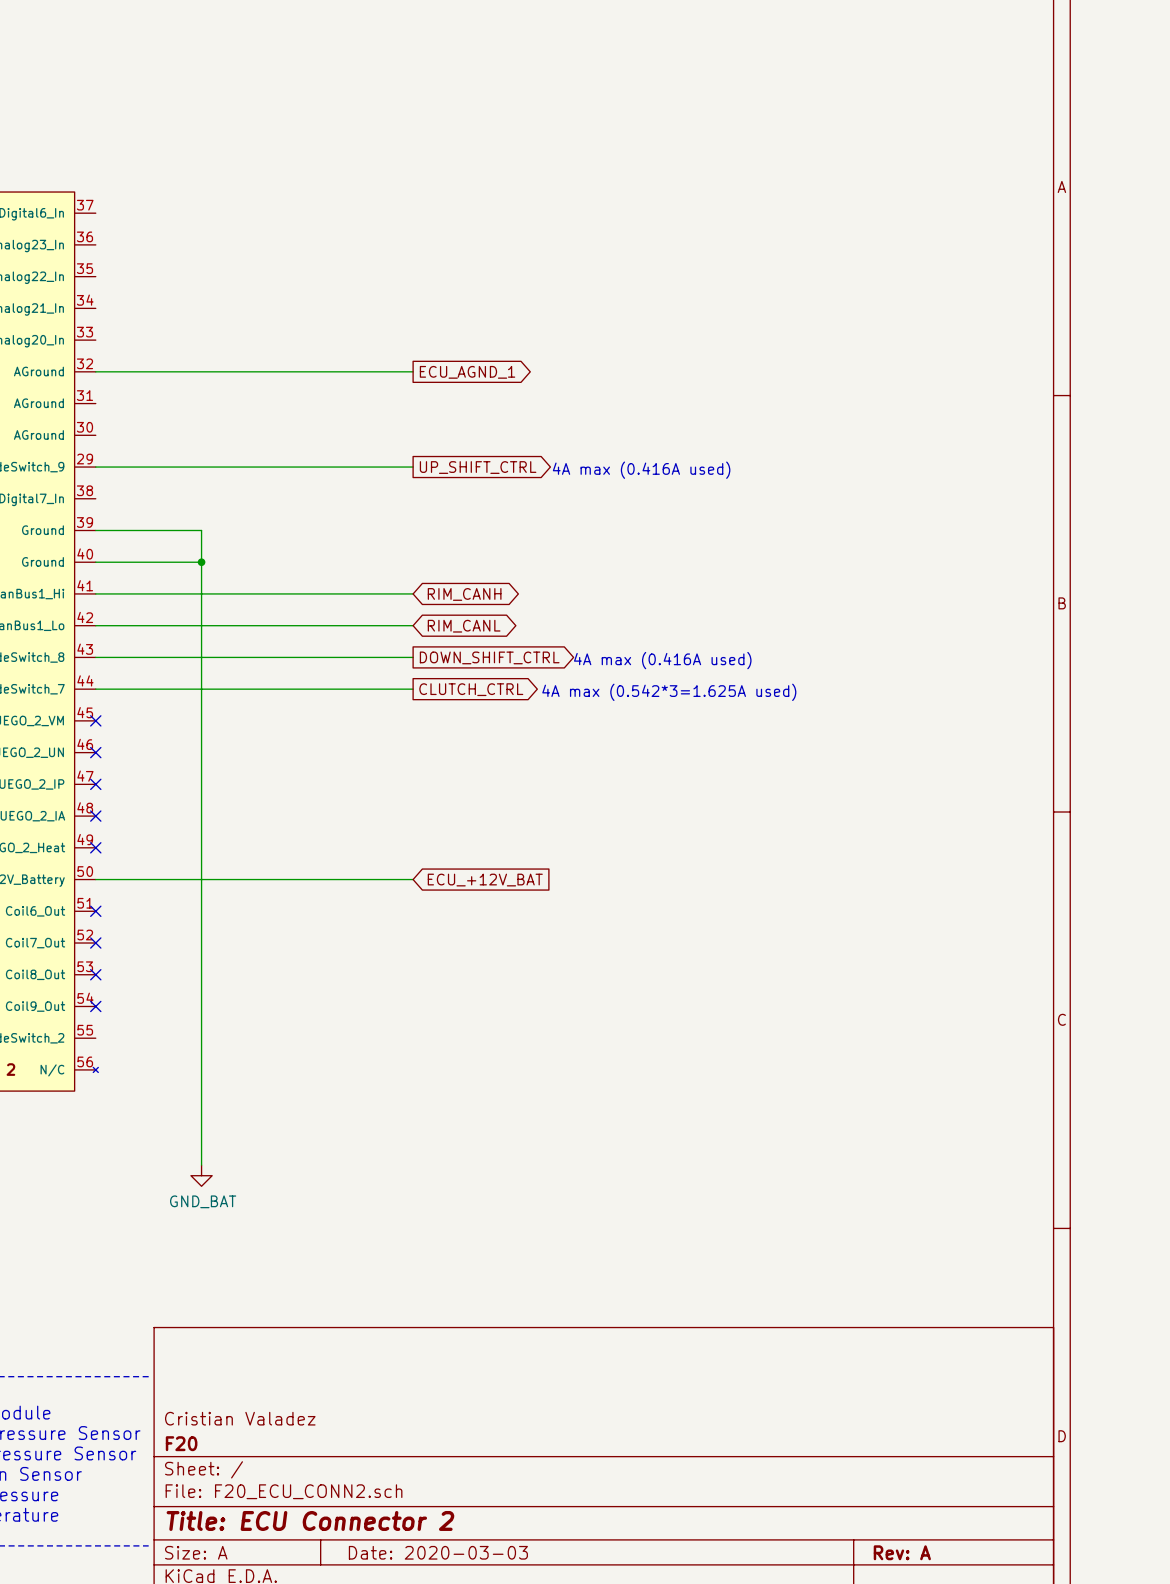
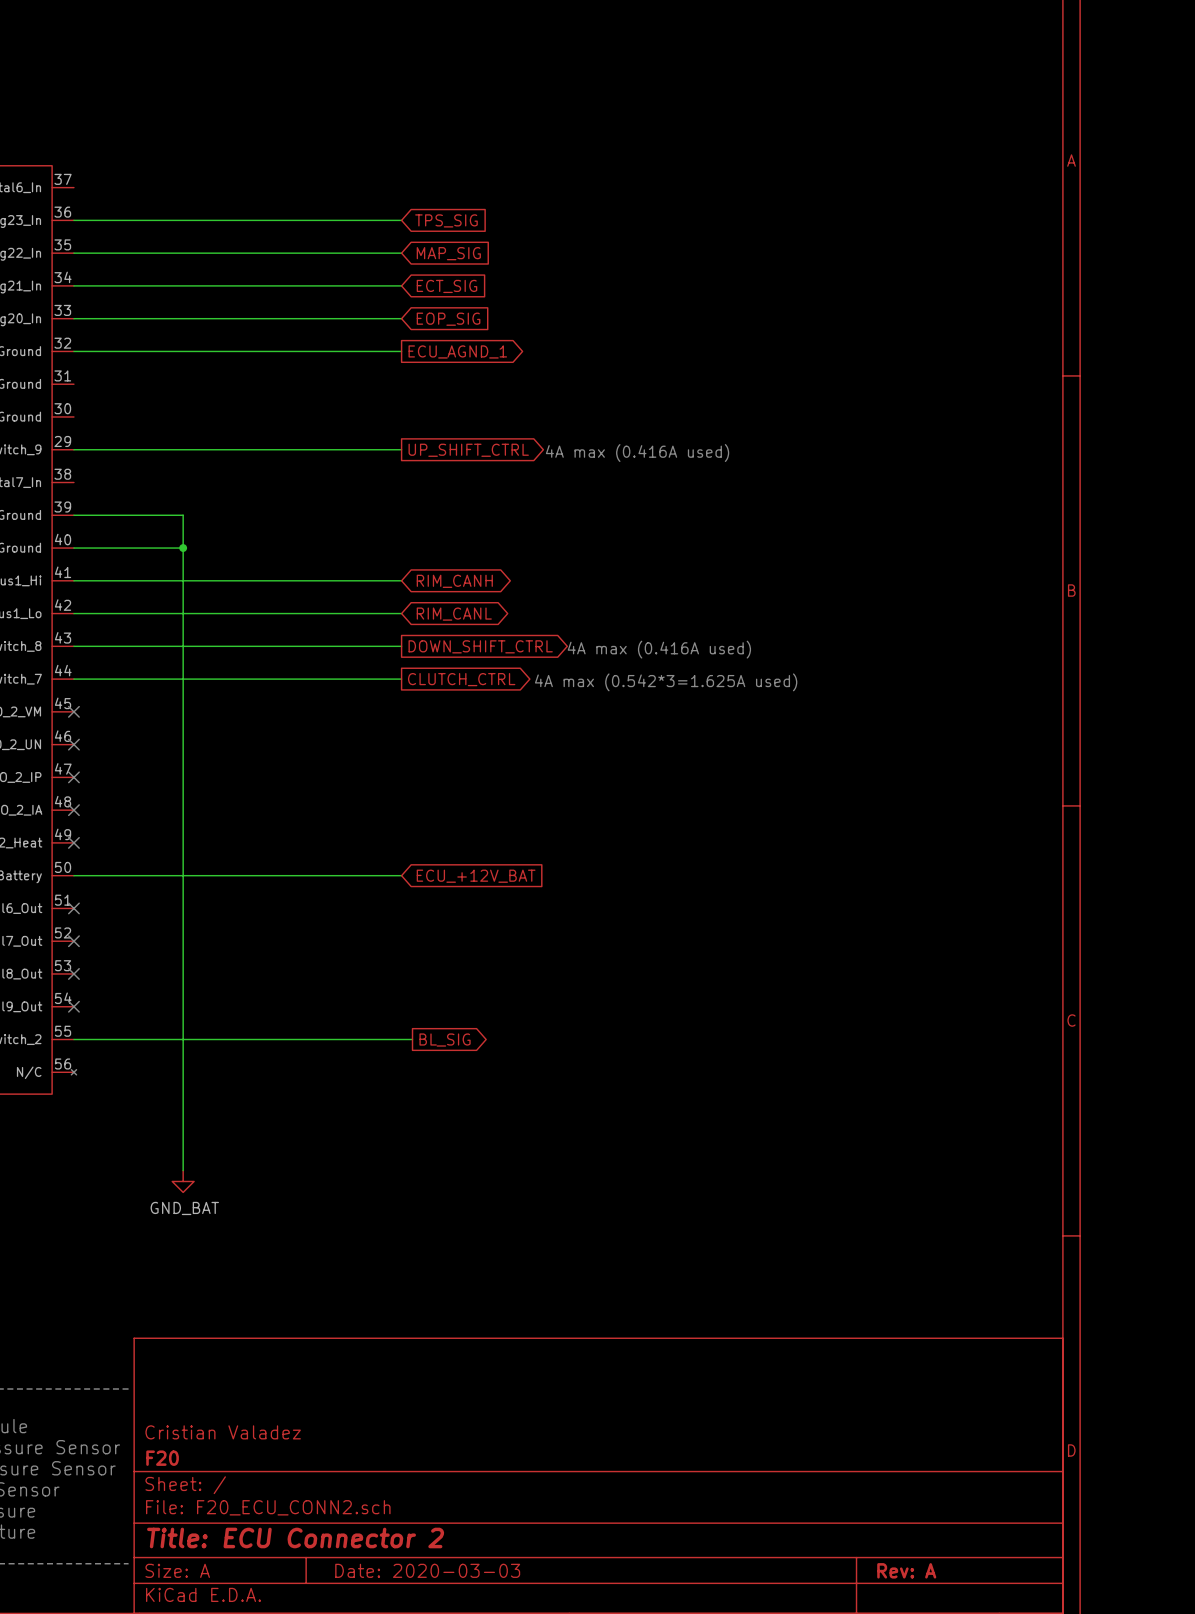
wire: none -> (73, 220) (401, 220)
global label: none -> TPS_SIG (446, 220)
wire: none -> (73, 253) (401, 253)
global label: none -> MAP_SIG (448, 253)
wire: none -> (73, 285) (401, 285)
global label: none -> ECT_SIG (446, 286)
wire: none -> (73, 318) (401, 318)
global label: none -> EOP_SIG (448, 319)
wire: none -> (73, 1039) (412, 1039)
global label: none -> BL_SIG (445, 1040)

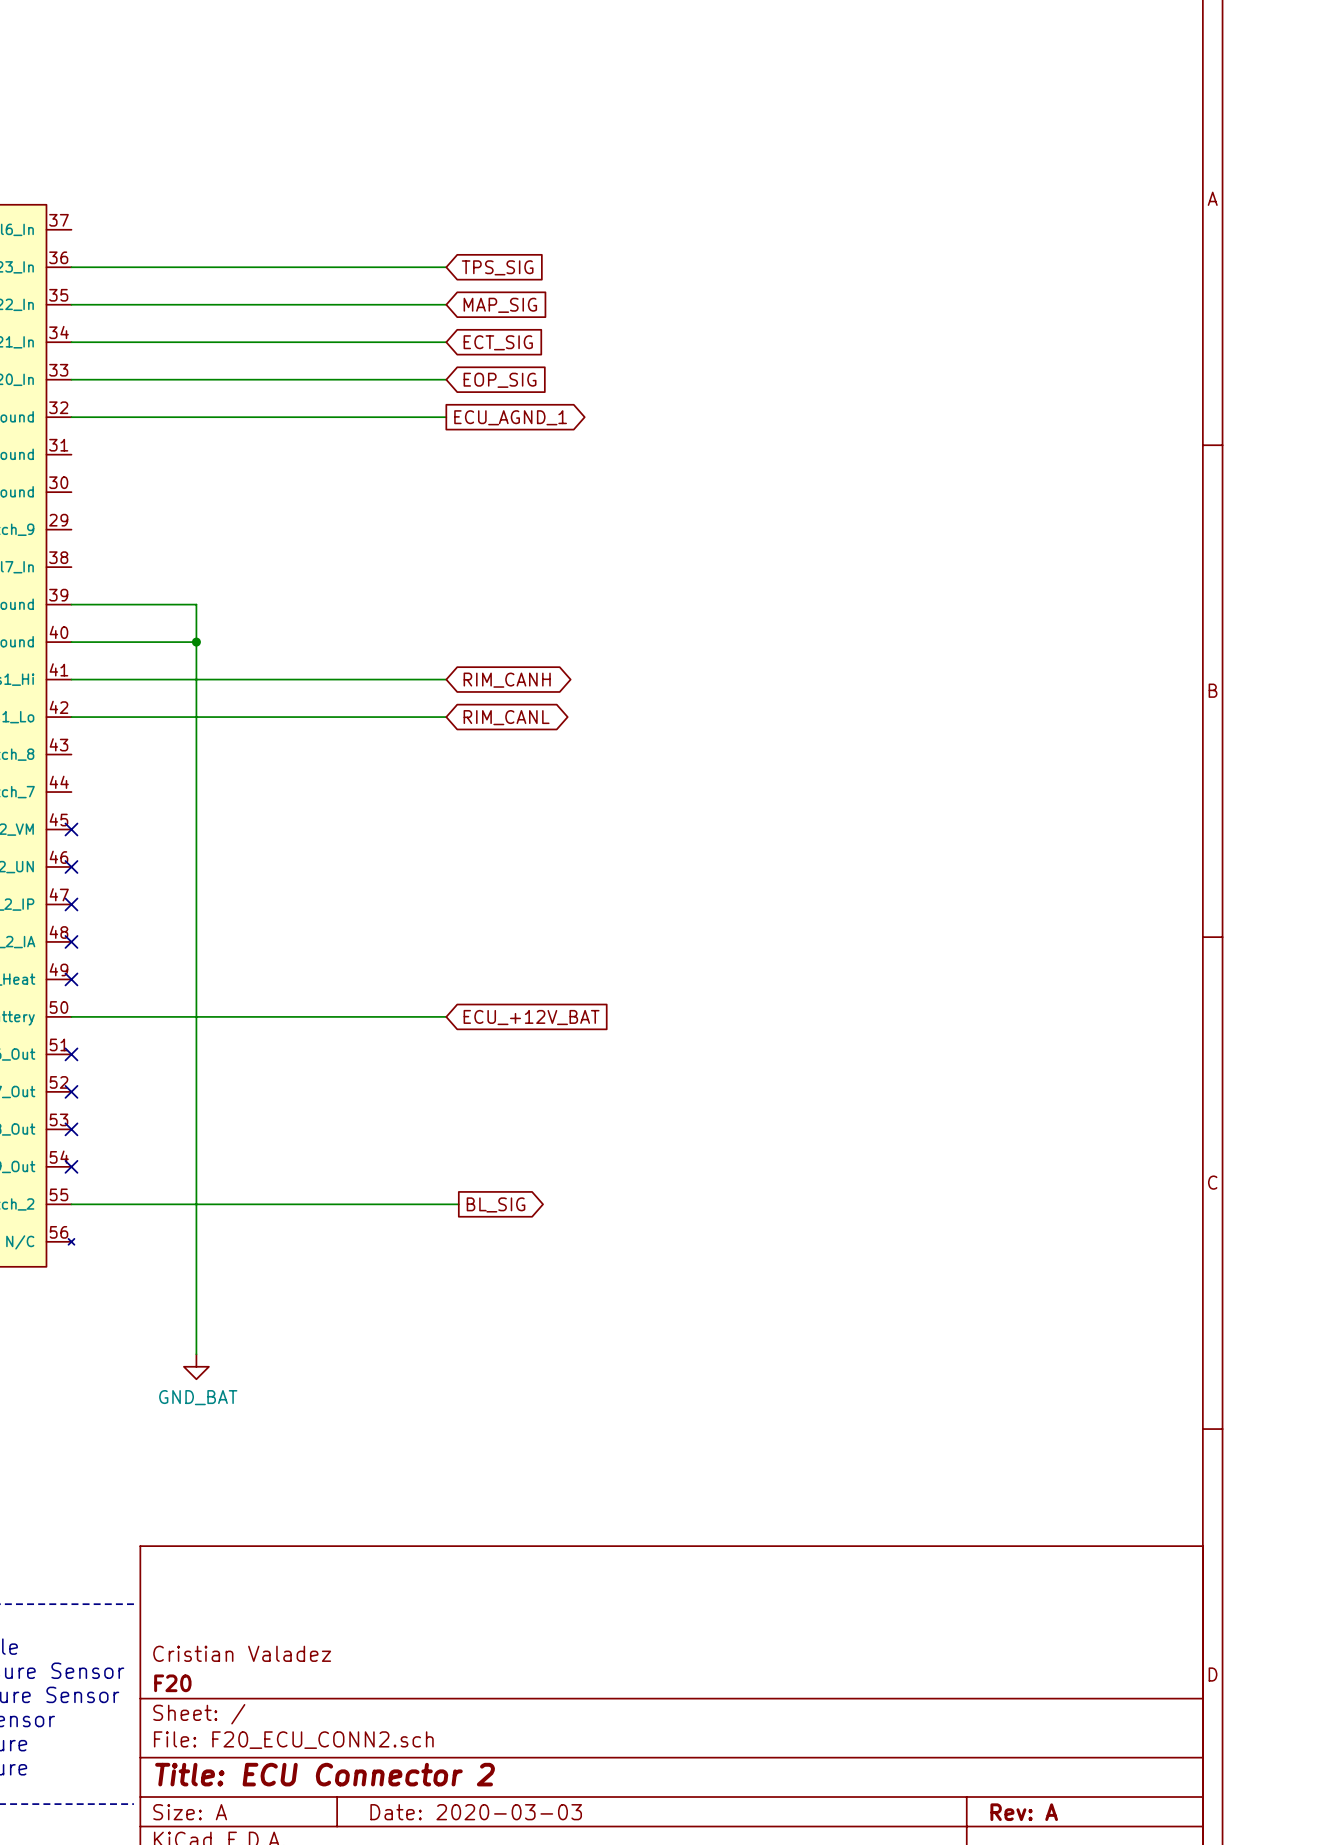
wire: (73, 449) (401, 449) -> none
global label: UP_SHIFT_CTRL (468, 450) -> none
text: 4A max (0.416A used) (637, 453) -> none
wire: (73, 646) (401, 646) -> none
global label: DOWN_SHIFT_CTRL (480, 646) -> none
text: 4A max (0.416A used) (659, 649) -> none
wire: (73, 679) (401, 679) -> none
global label: CLUTCH_CTRL (461, 679) -> none
text: 4A max (0.542*3=1.625A used) (666, 682) -> none

